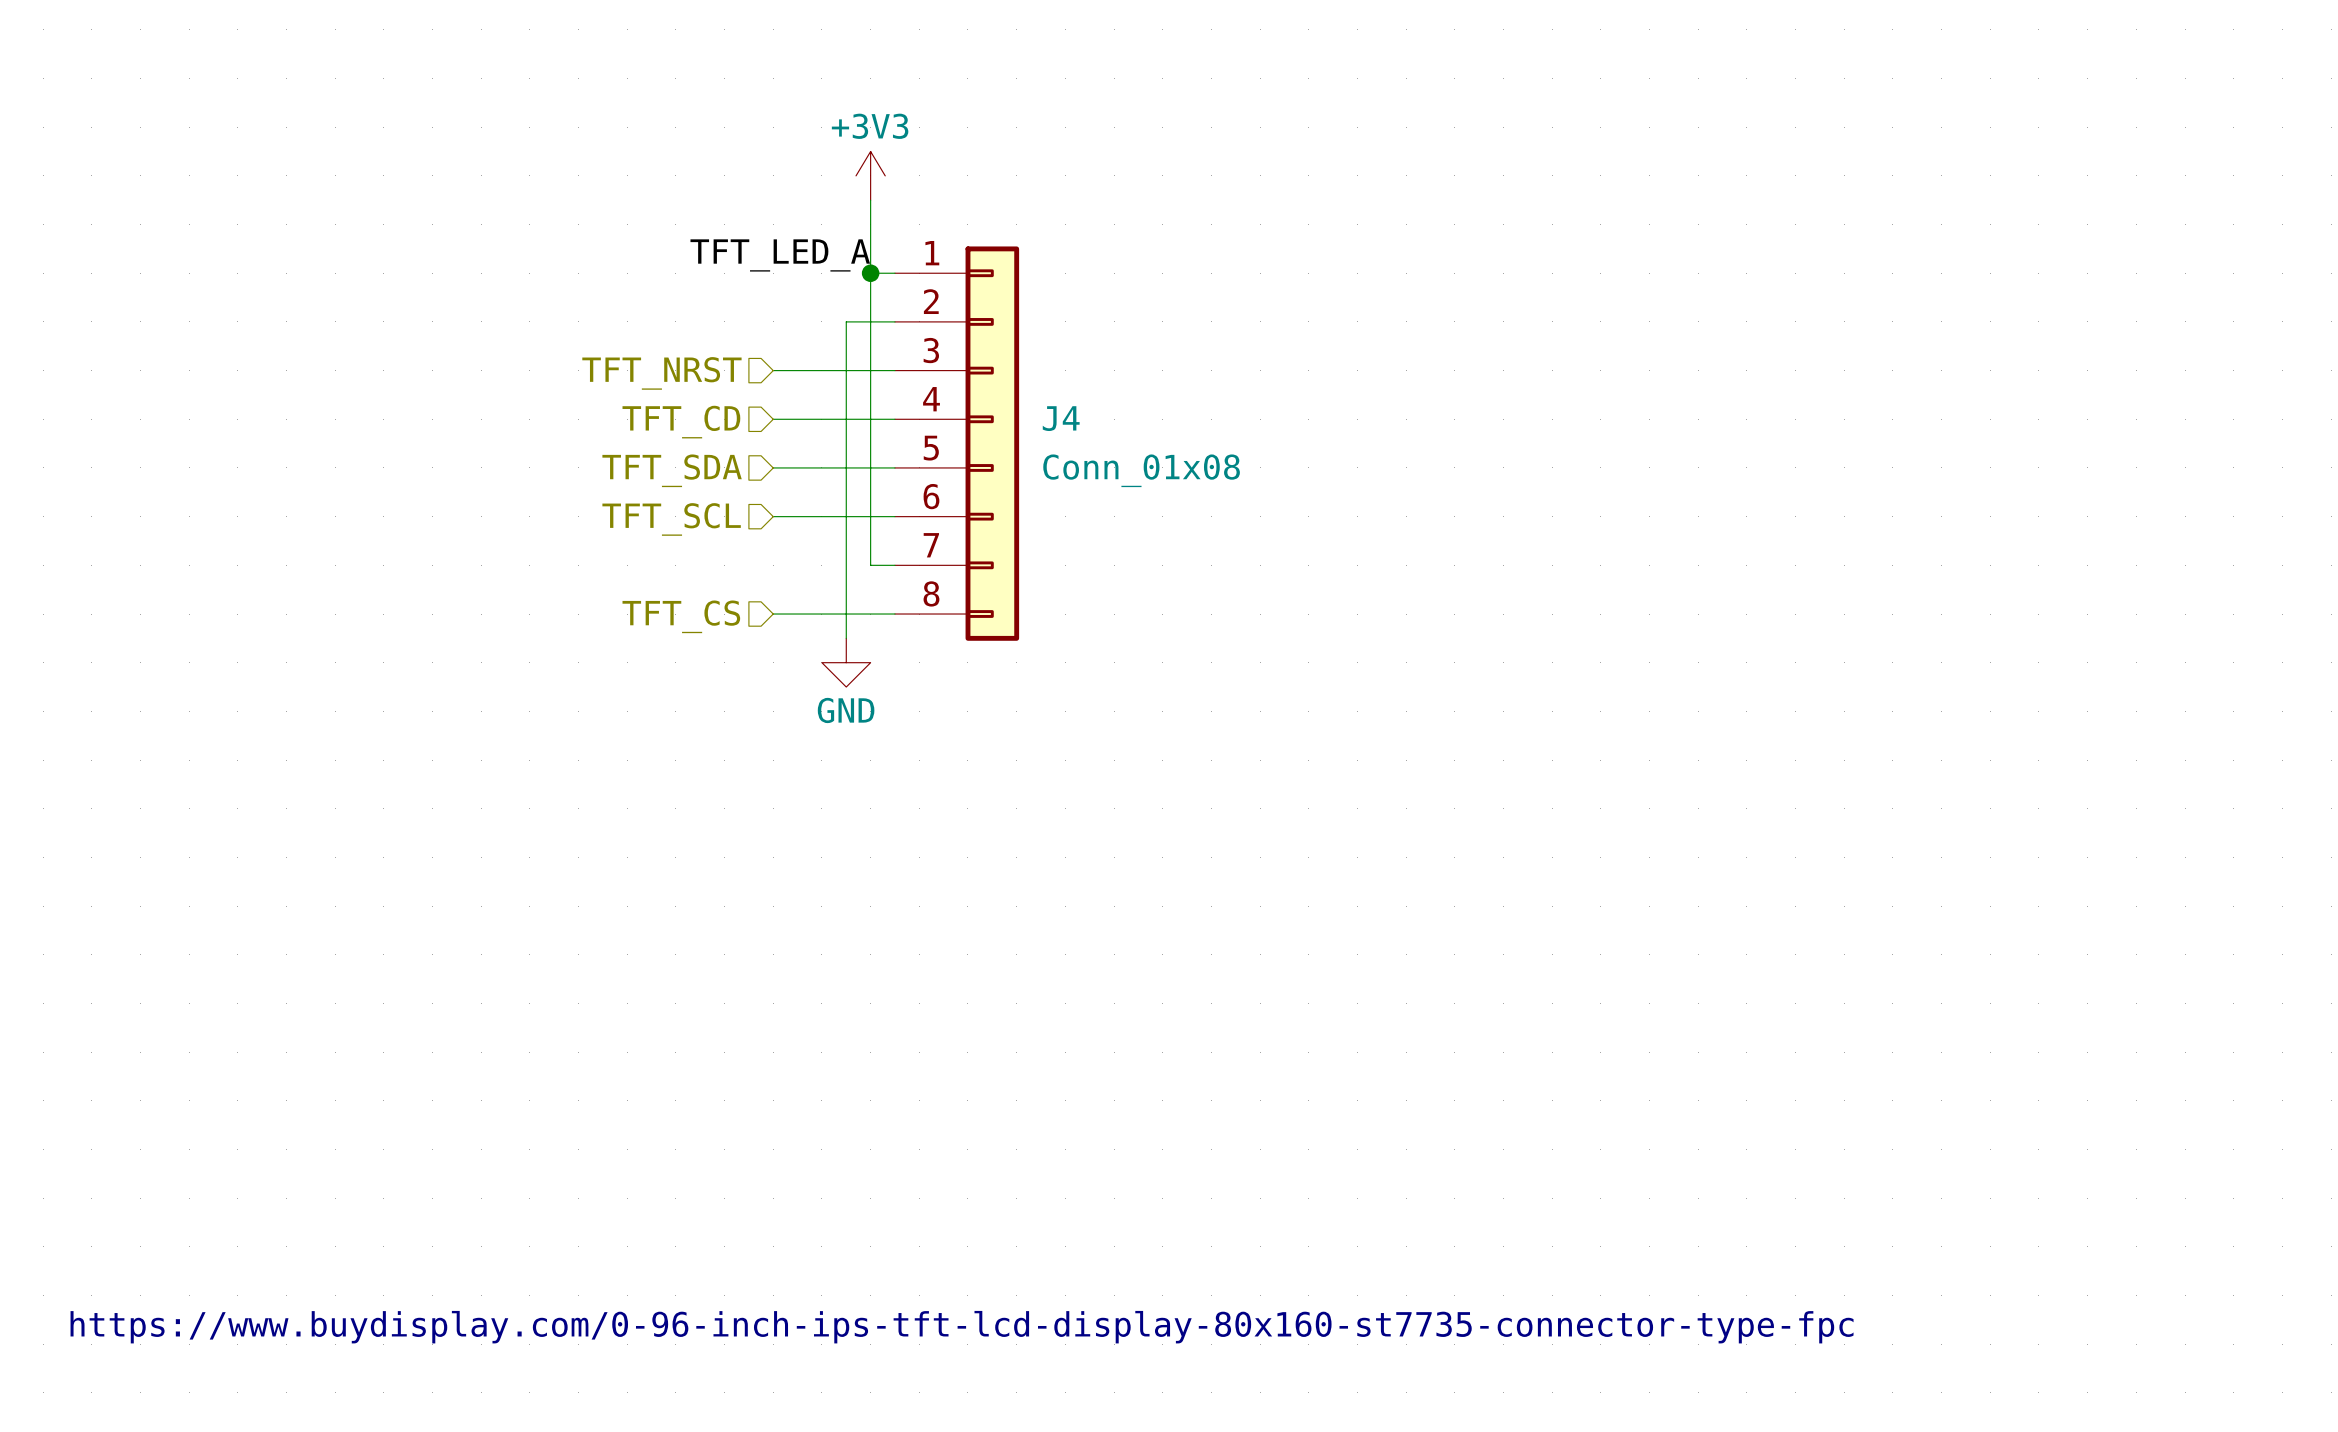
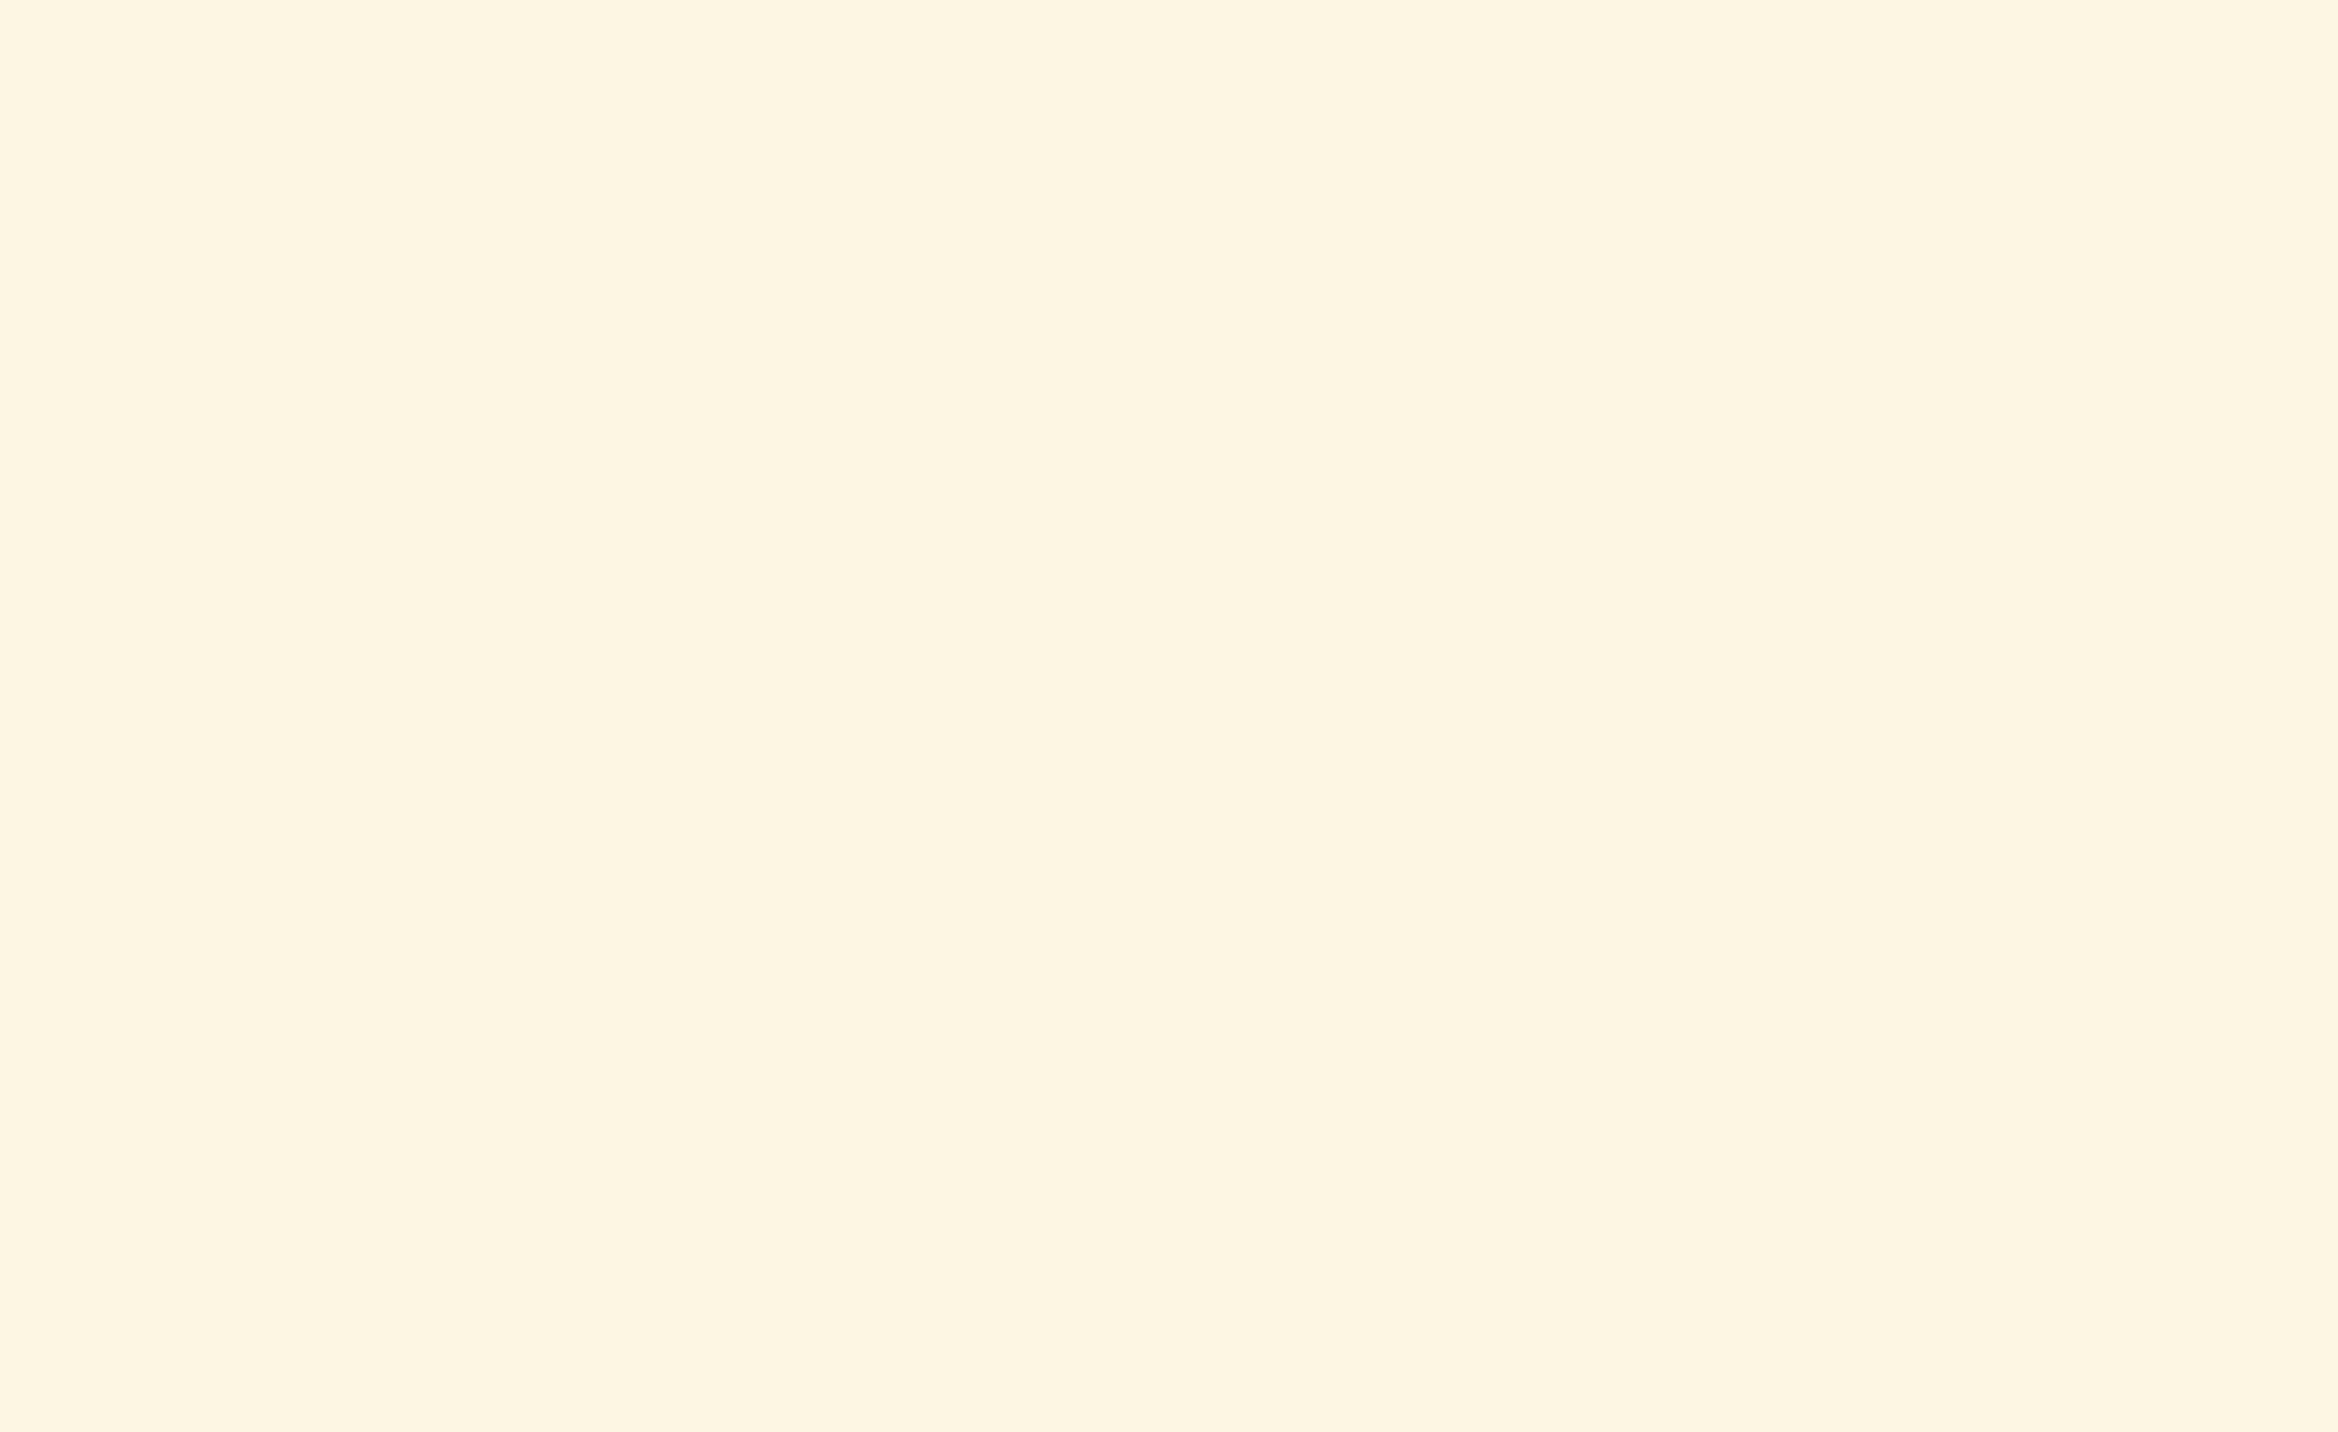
power symbol: +3V3 (870, 175) -> none
wire: (870, 200) (870, 565) (894, 565) -> none
label: TFT_LED_A (780, 255) -> none
wire: (870, 273) (894, 273) -> none
junction: (870, 273) -> none
wire: (894, 321) (846, 321) (846, 638) -> none
wire: (773, 370) (894, 370) -> none
hierarchical label: TFT_NRST (661, 373) -> none
wire: (773, 419) (894, 419) -> none
hierarchical label: TFT_CD (681, 422) -> none
J4: Conn_01x08 (957, 443) -> none
wire: (773, 467) (894, 467) -> none
hierarchical label: TFT_SDA (672, 470) -> none
wire: (773, 516) (894, 516) -> none
hierarchical label: TFT_SCL (671, 519) -> none
wire: (773, 614) (894, 614) -> none
hierarchical label: TFT_CS (681, 616) -> none
power symbol: GND (846, 662) -> none
text: https://www.buydisplay.com/0-96-inch-ips-tft-lcd-display-80x160-st7735-connector-type-fpc (962, 1327) -> none

